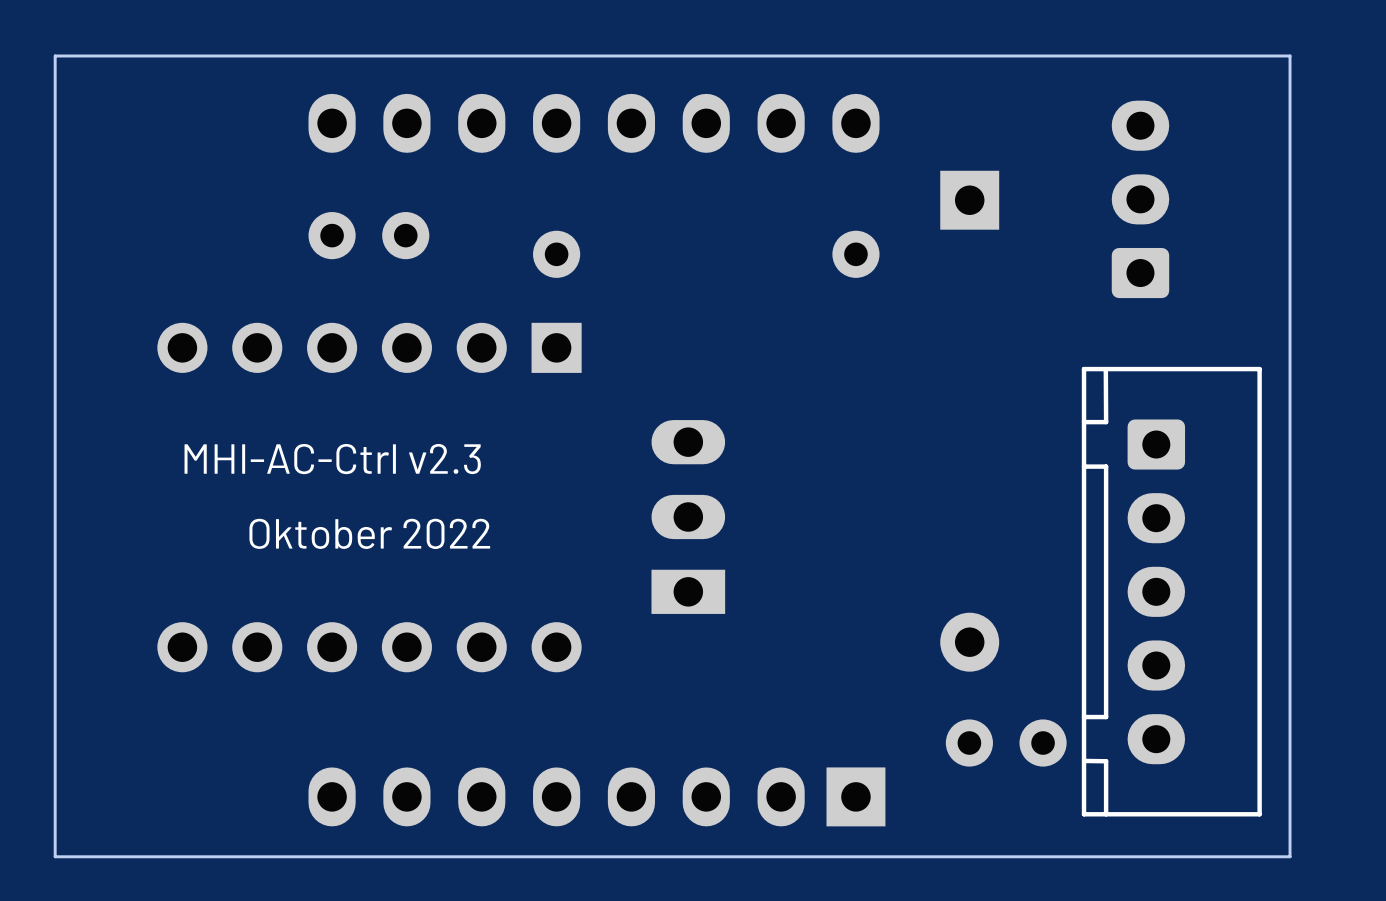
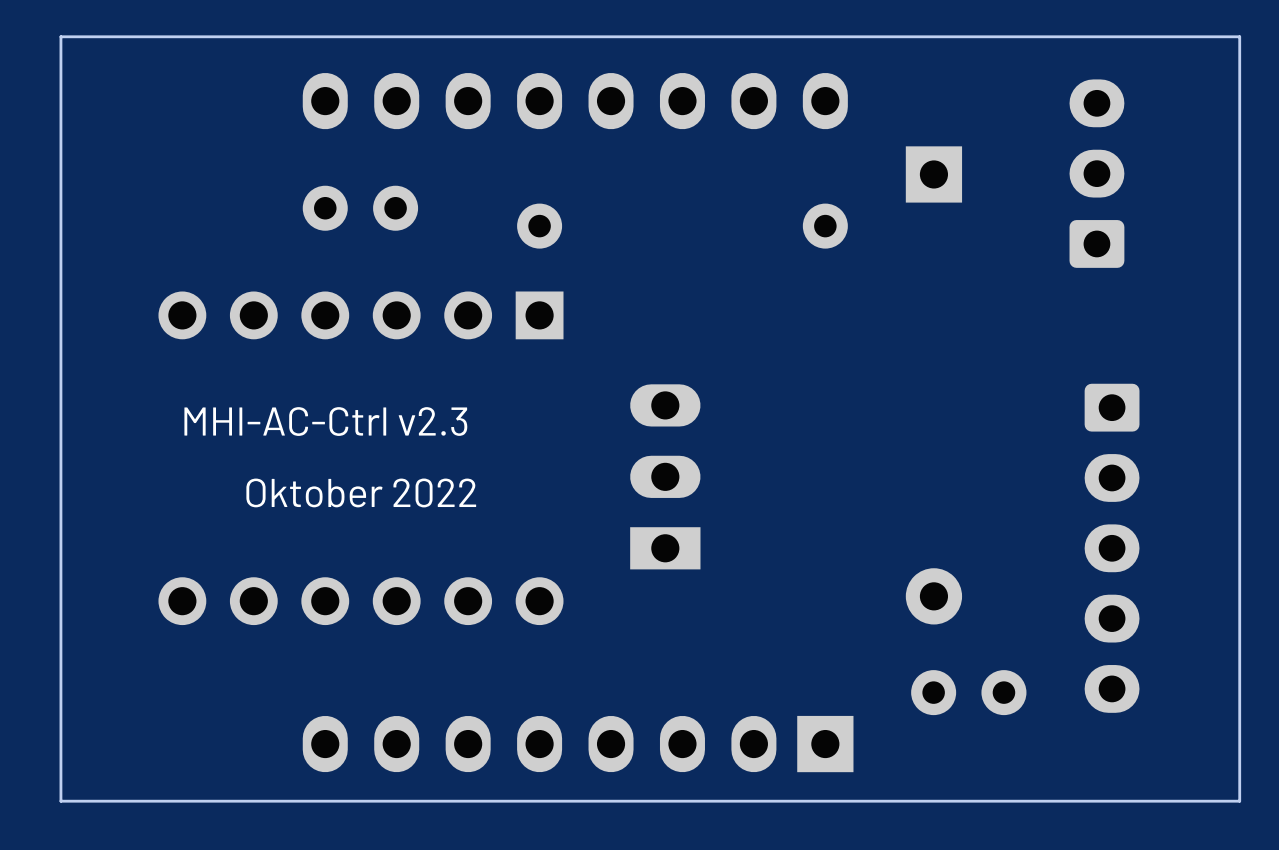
line: (1105, 369) (1106, 422) (1084, 422) -> none
line: (1259, 369) (1084, 369) (1084, 814) (1259, 814) (1259, 369) -> none
line: (1084, 466) (1106, 466) (1106, 717) (1084, 717) -> none
line: (1084, 760) (1106, 761) (1106, 814) -> none

